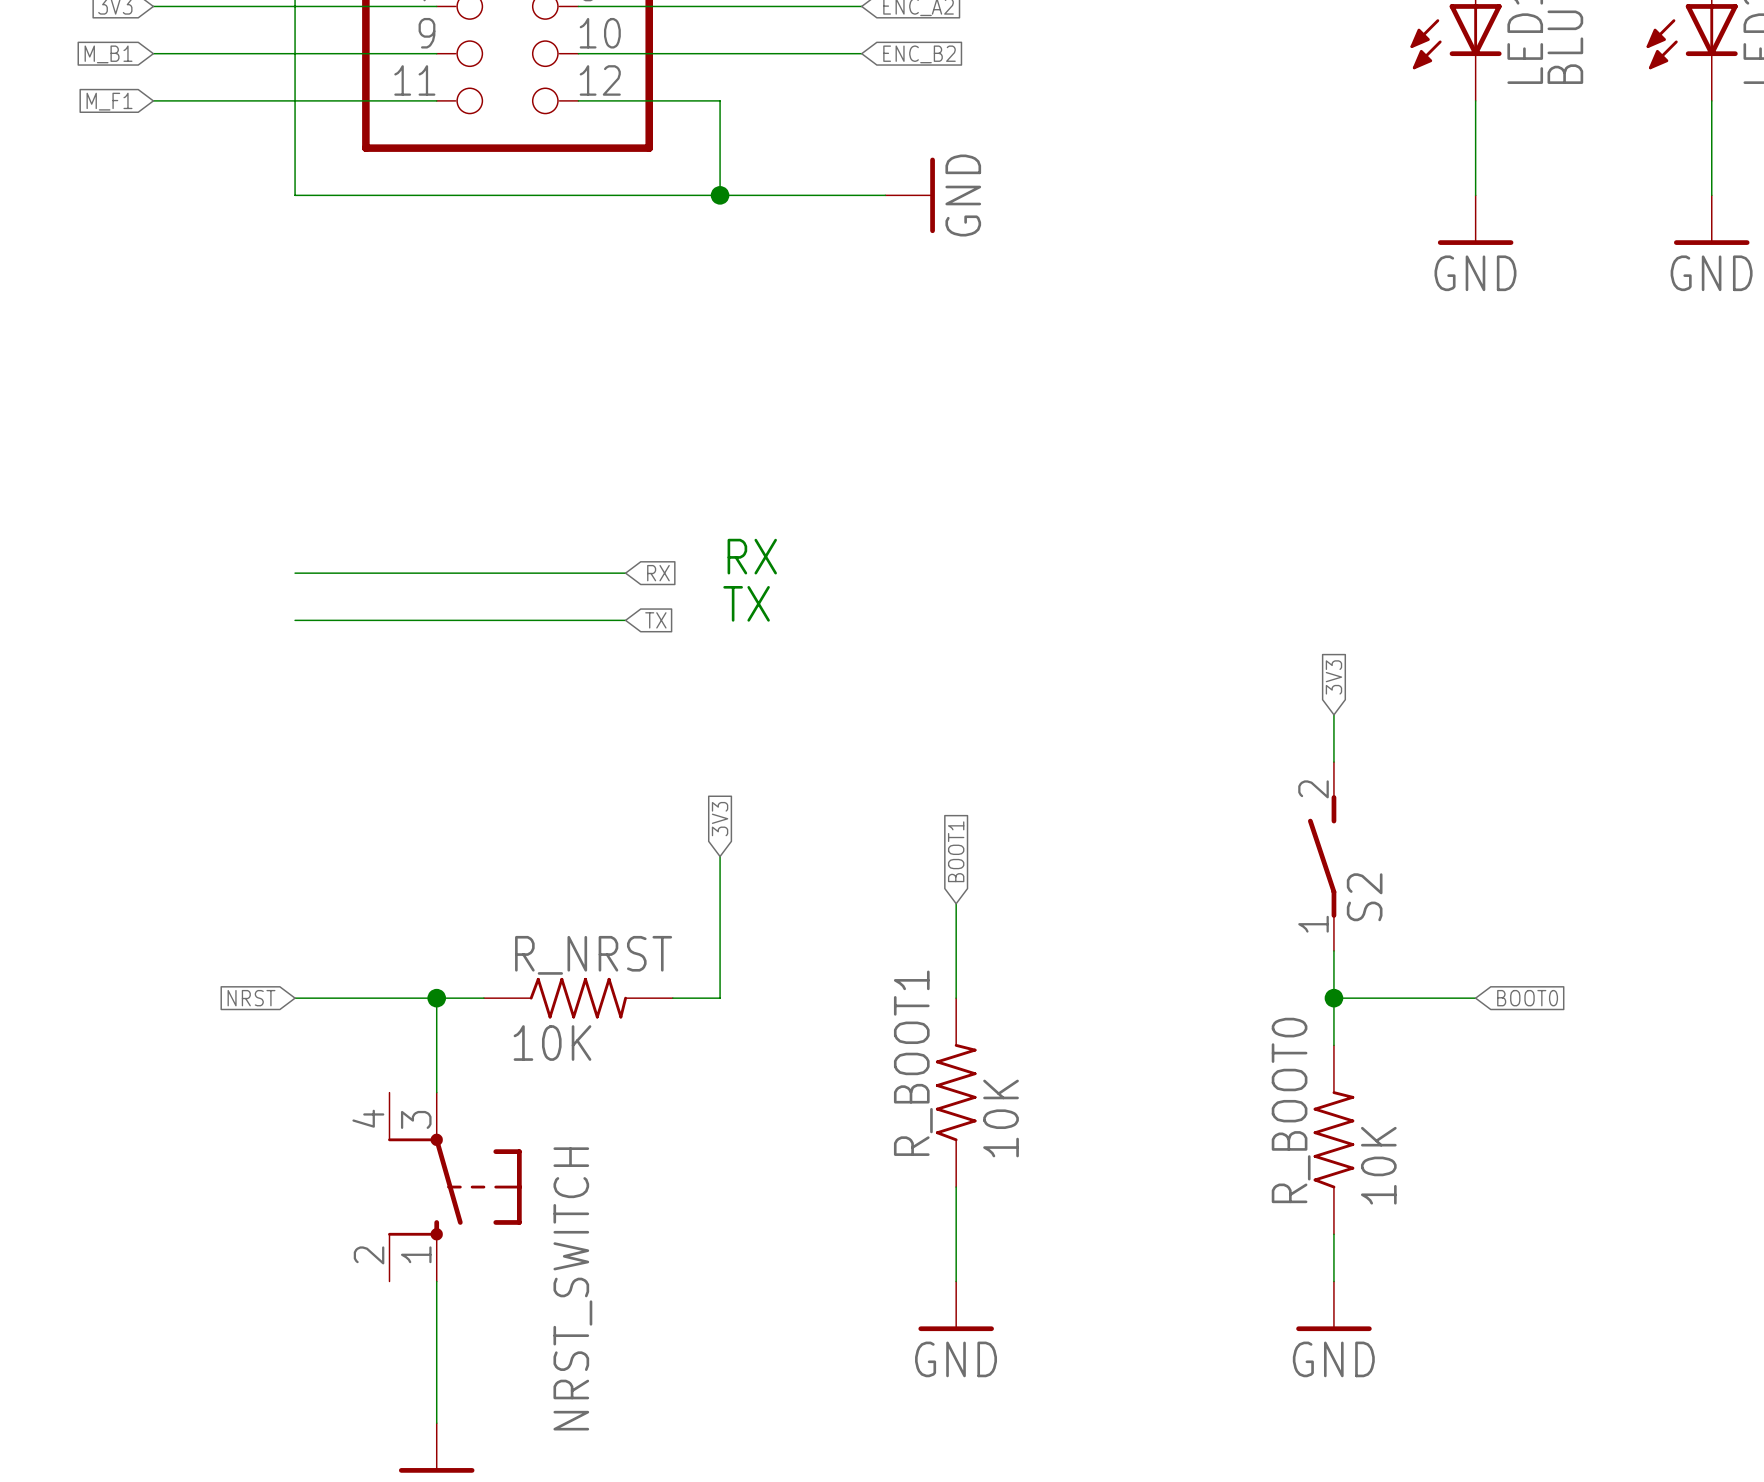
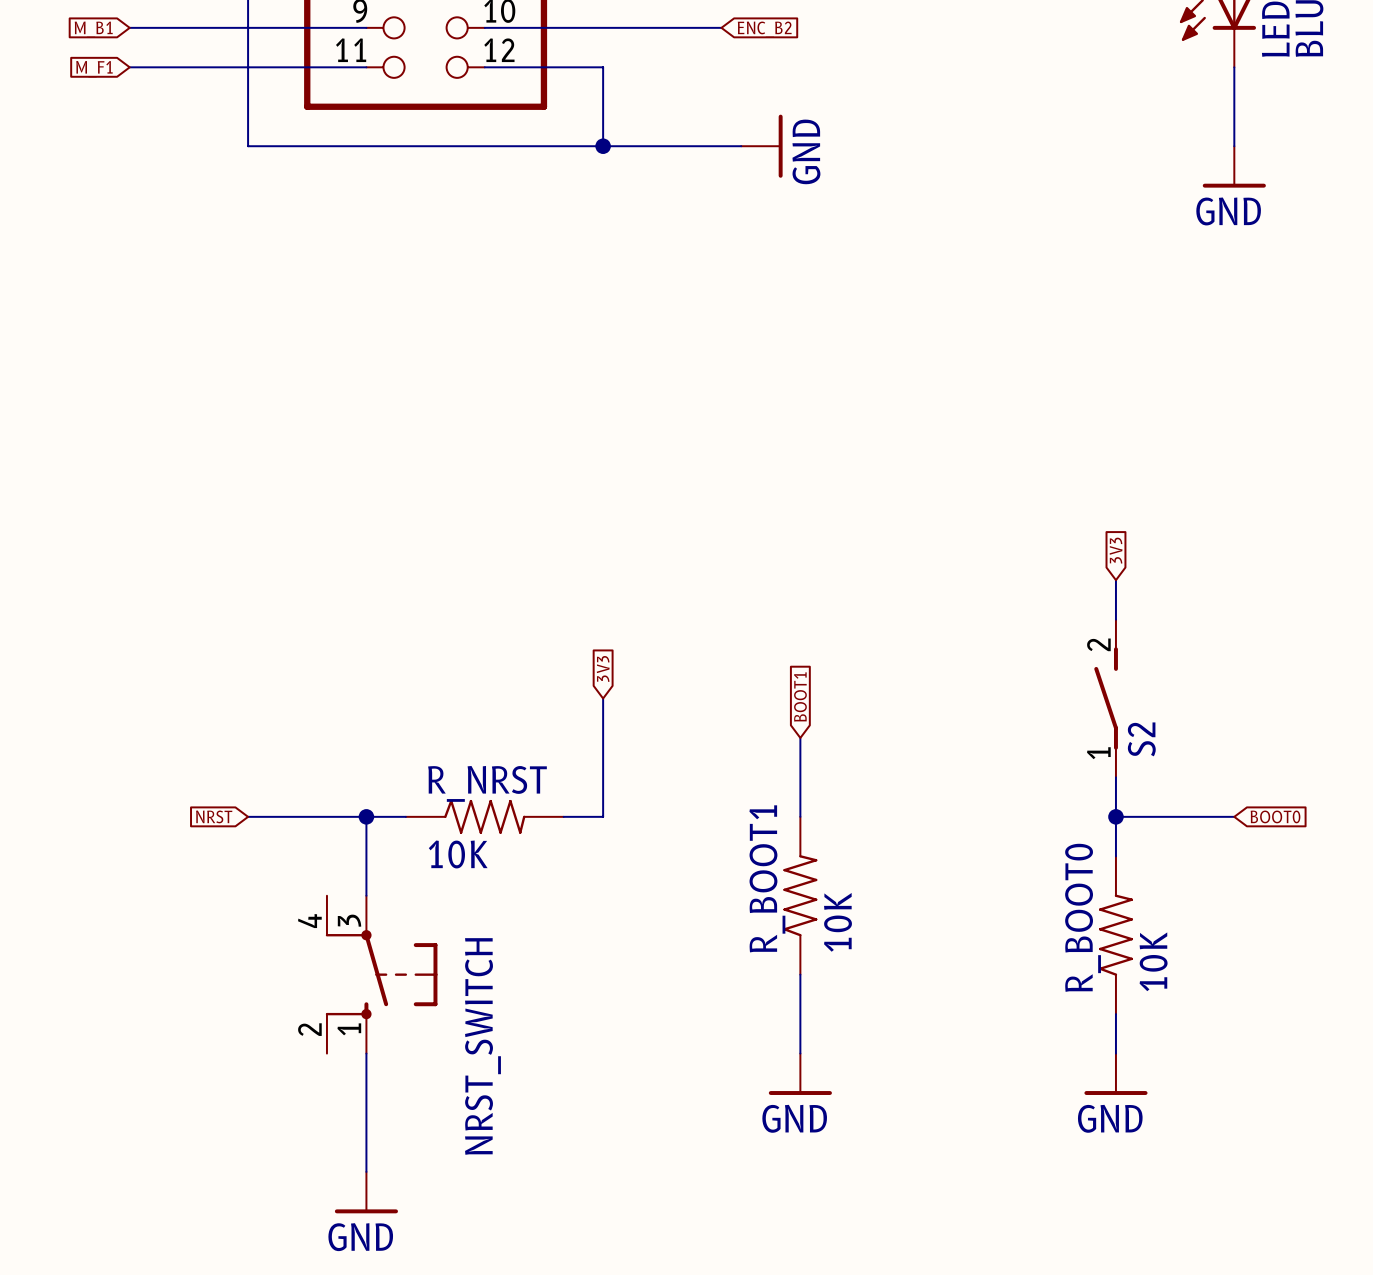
text: RX (752, 556) -> none
wire: (295, 573) (625, 573) -> none
global label: RX (658, 573) -> none
text: TX (746, 603) -> none
wire: (295, 620) (625, 620) -> none
global label: TX (655, 620) -> none

